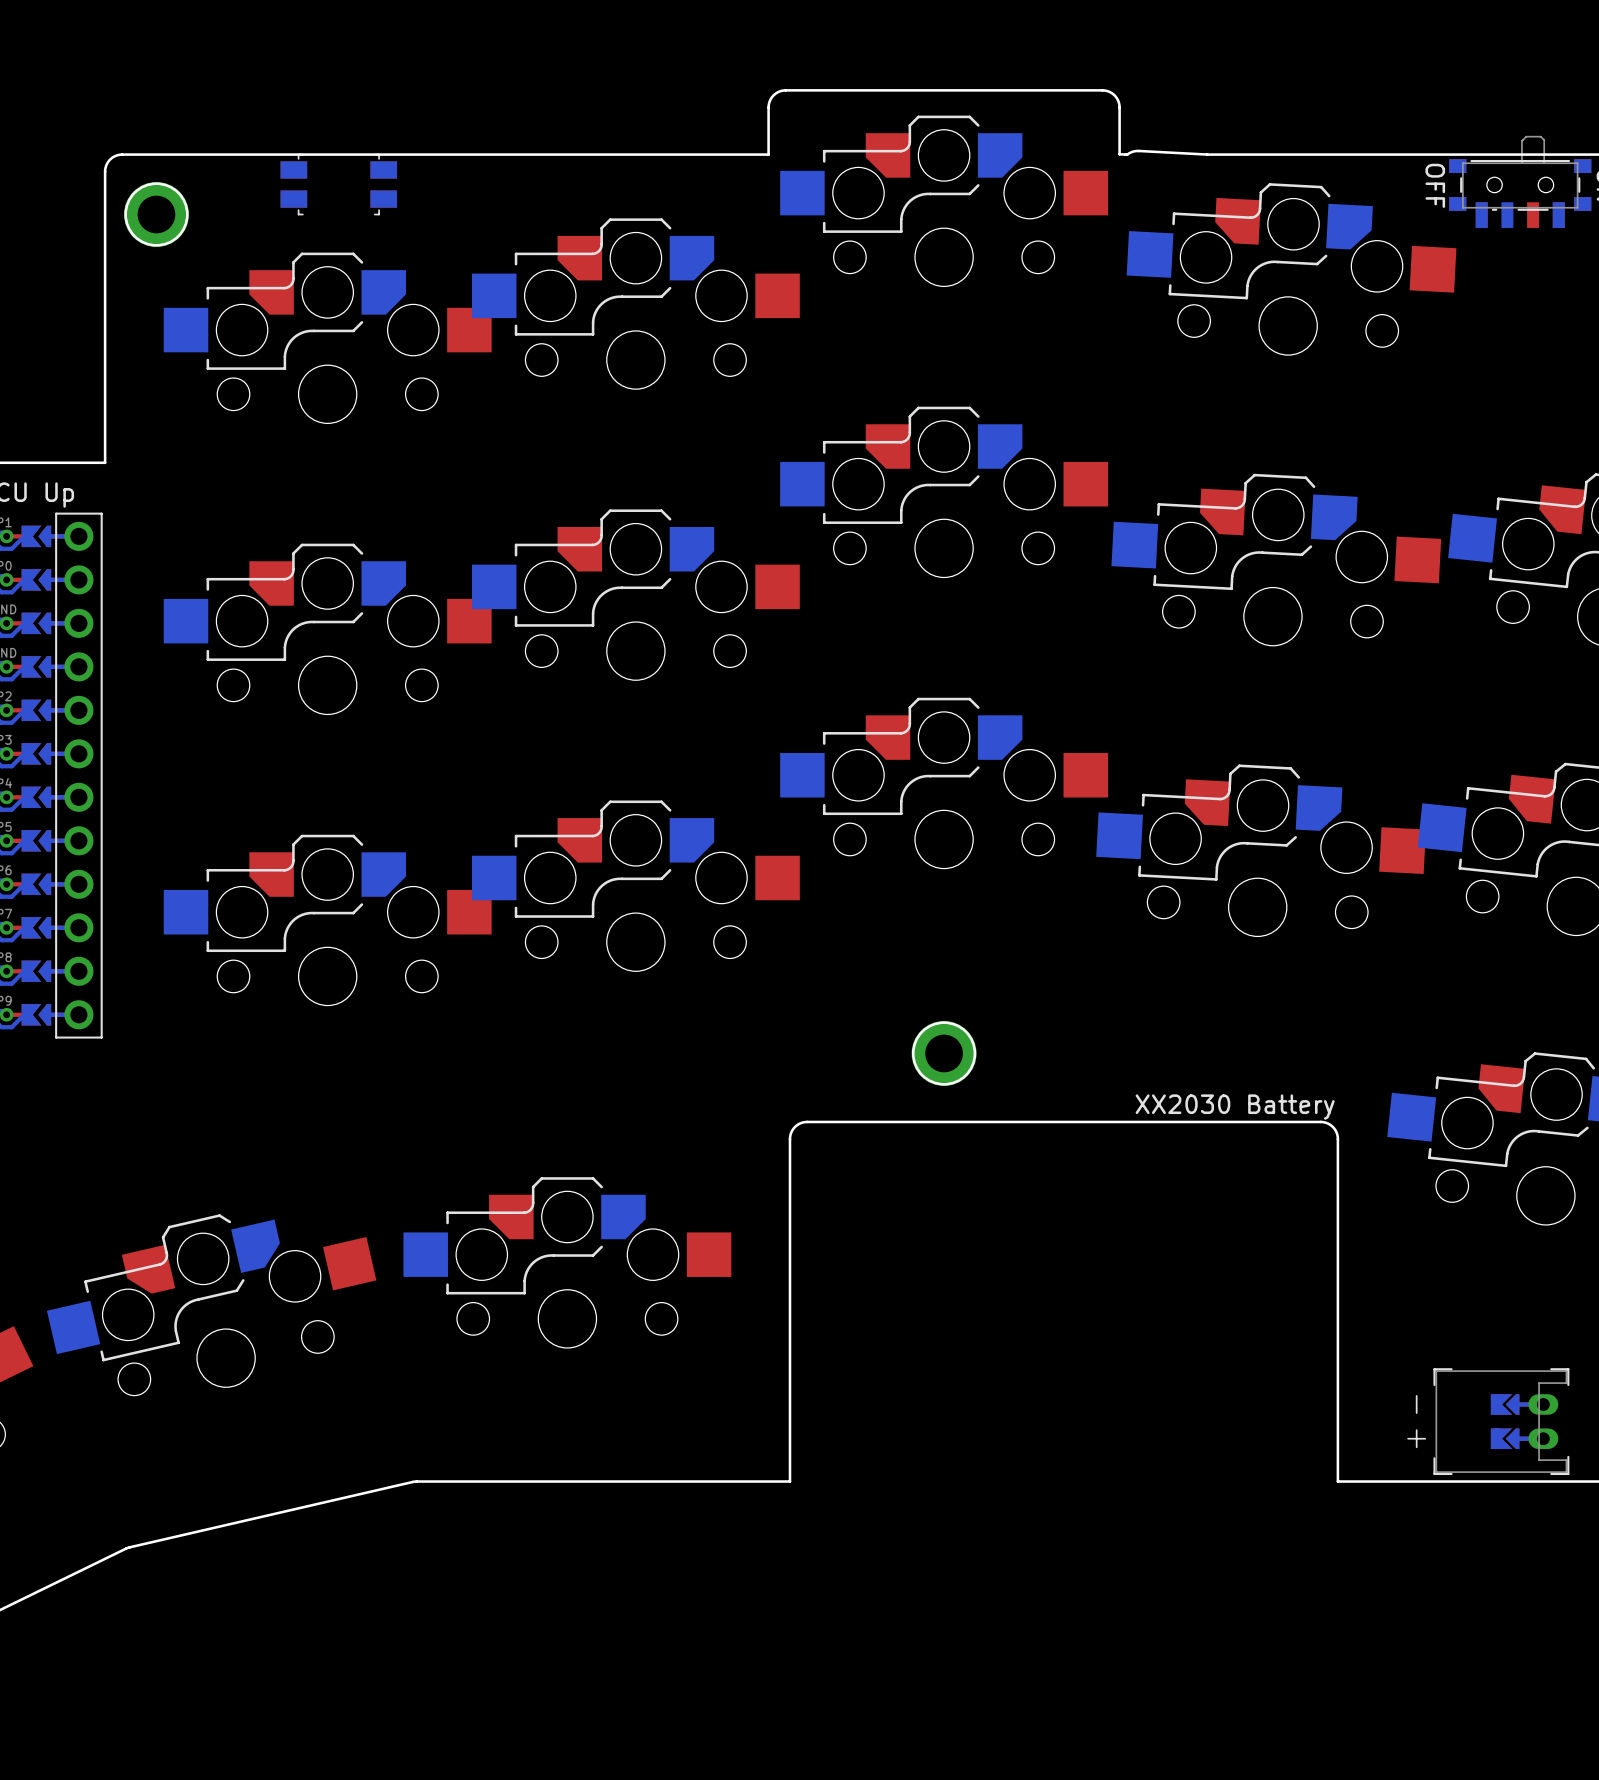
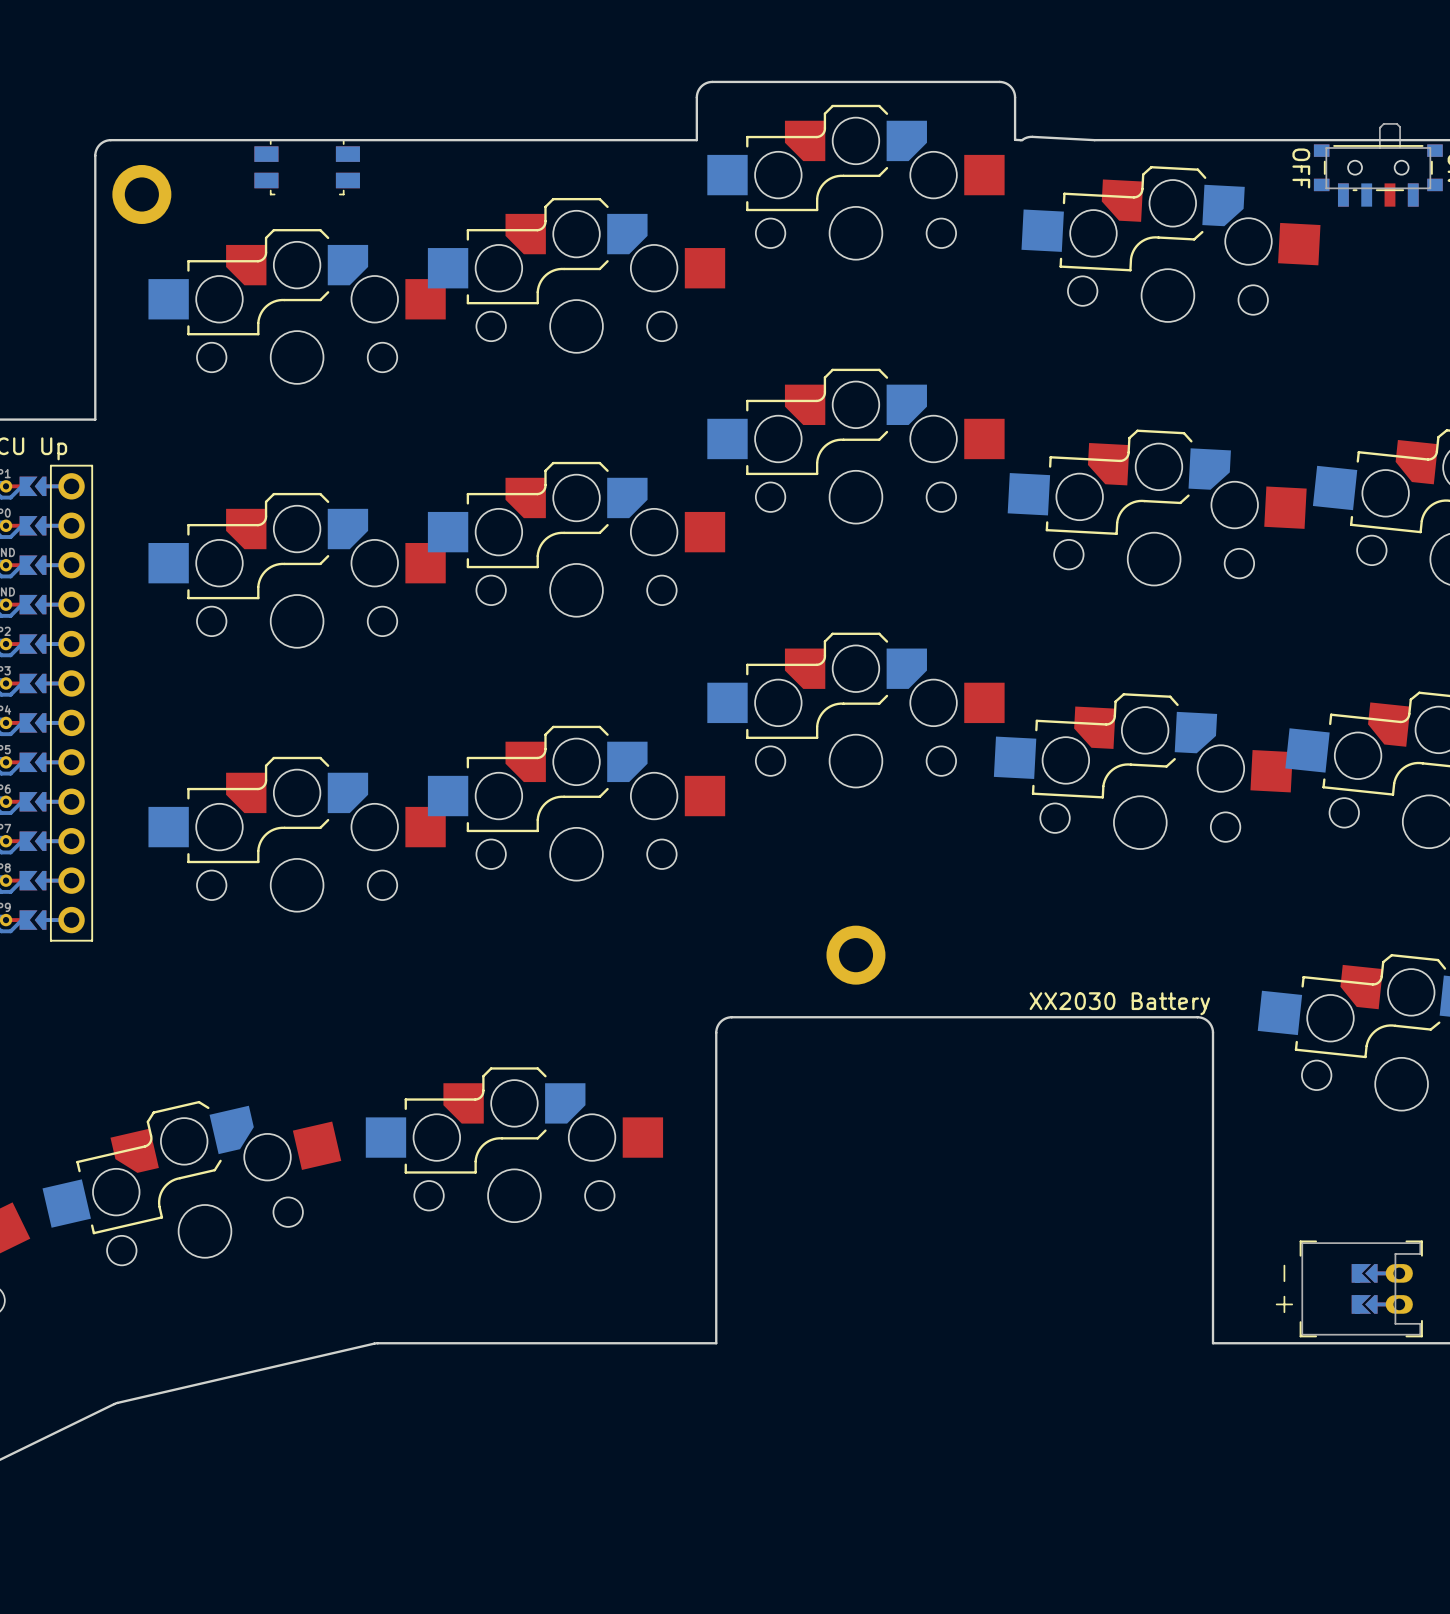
round board edge: [124, 182, 189, 247] -> none
round board edge: [911, 1021, 977, 1086] -> none

